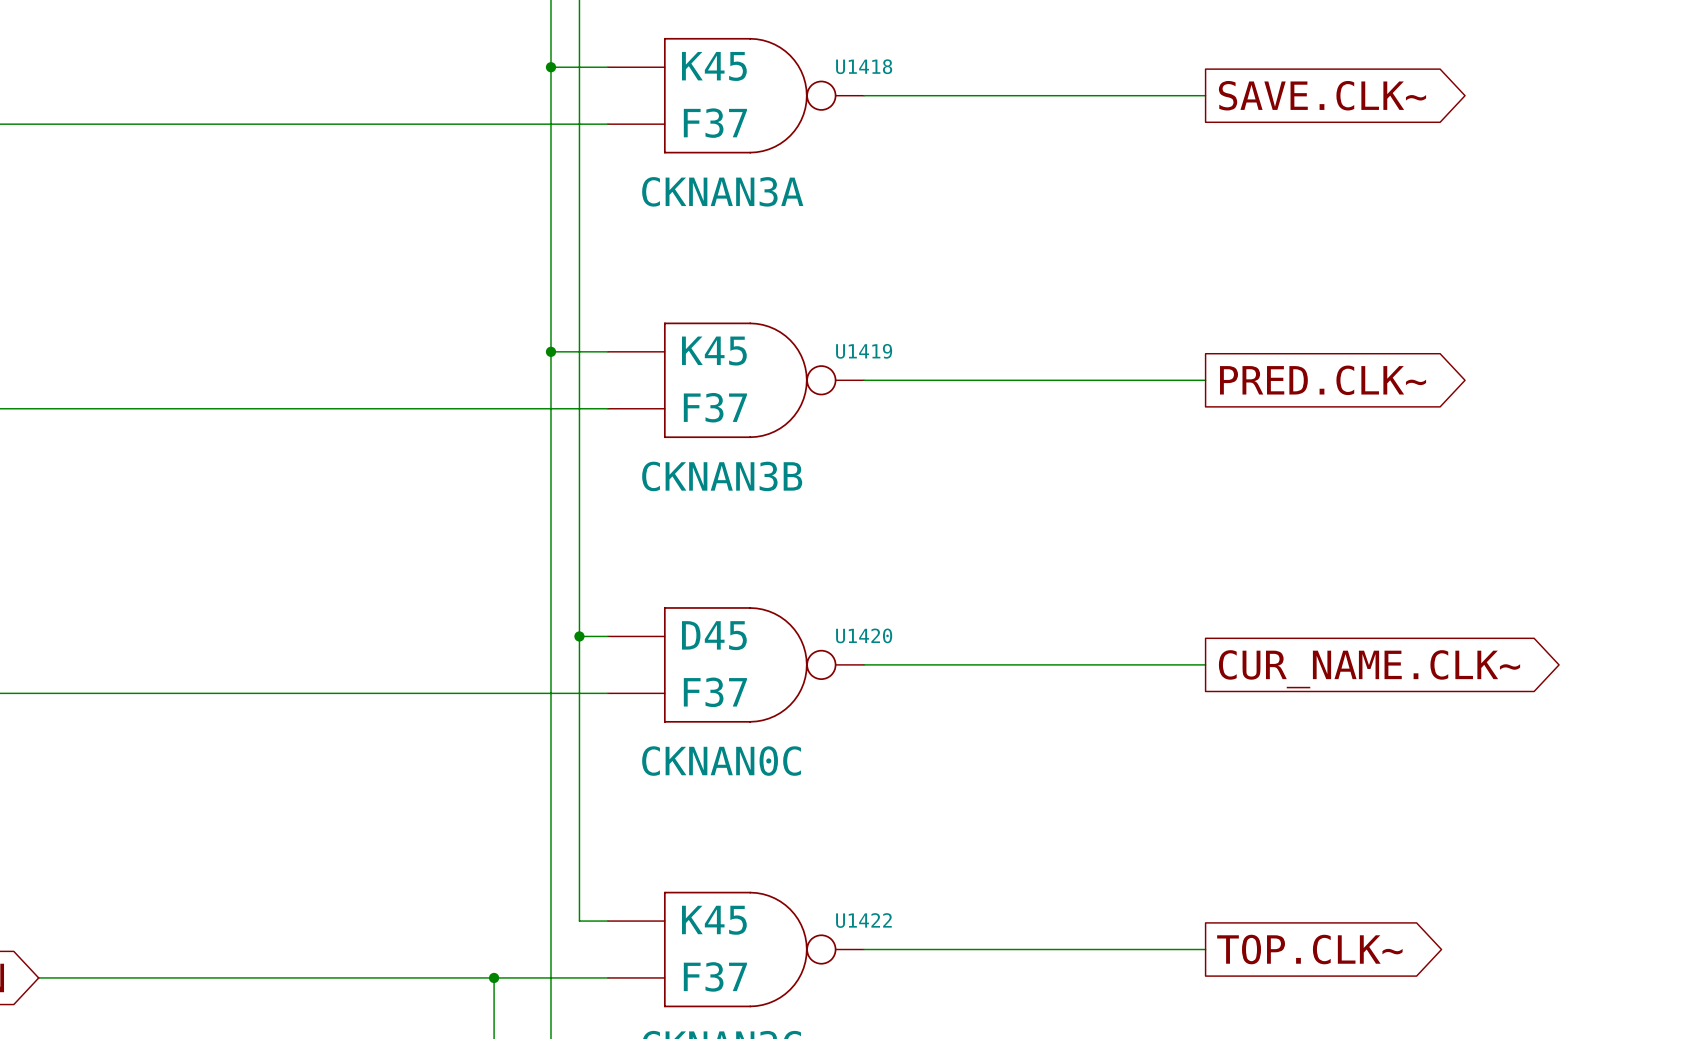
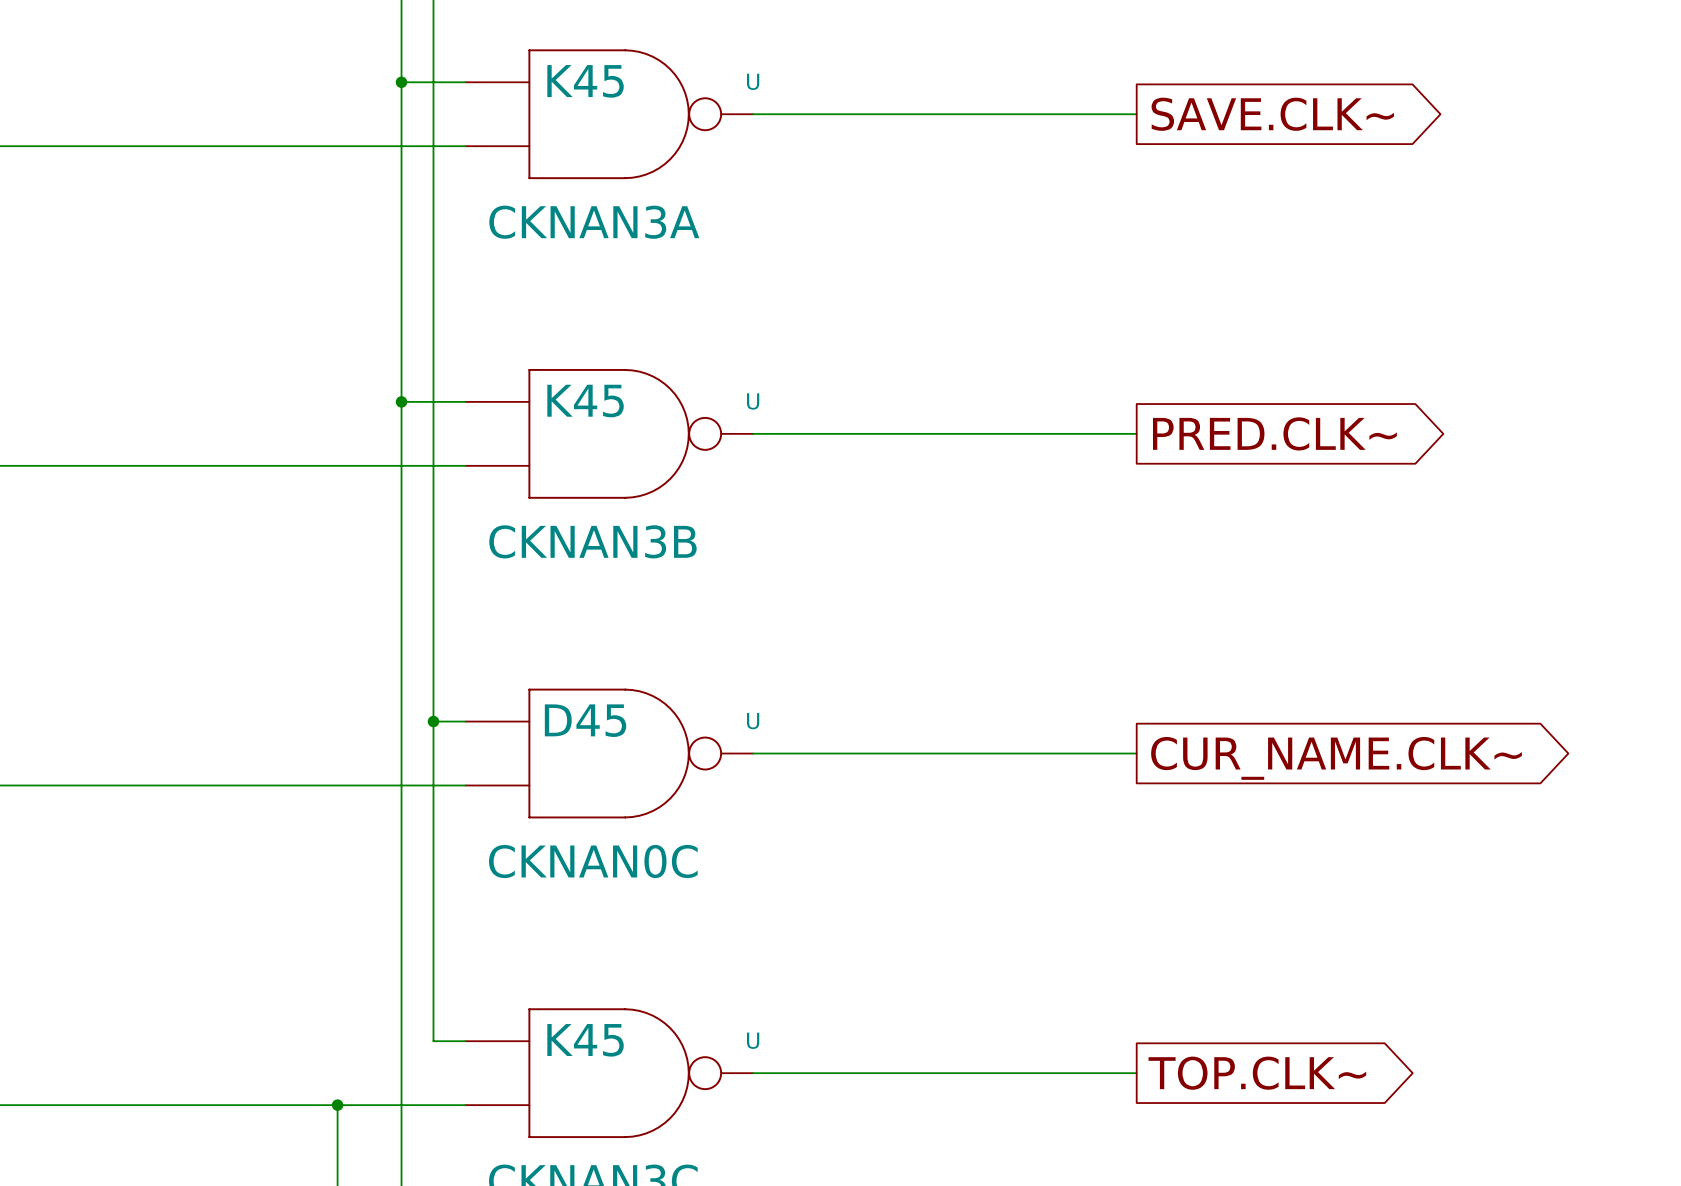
U1418 name: U1418 (864, 66) -> U (753, 81)
U1418 value: F37 (715, 123) -> none
U1419 name: U1419 (864, 351) -> U (753, 401)
U1419 value: F37 (715, 407) -> none
U1420 name: U1420 (864, 635) -> U (753, 721)
U1420 value: F37 (715, 692) -> none
U1422 name: U1422 (863, 920) -> U (753, 1040)
U1422 value: F37 (715, 976) -> none

